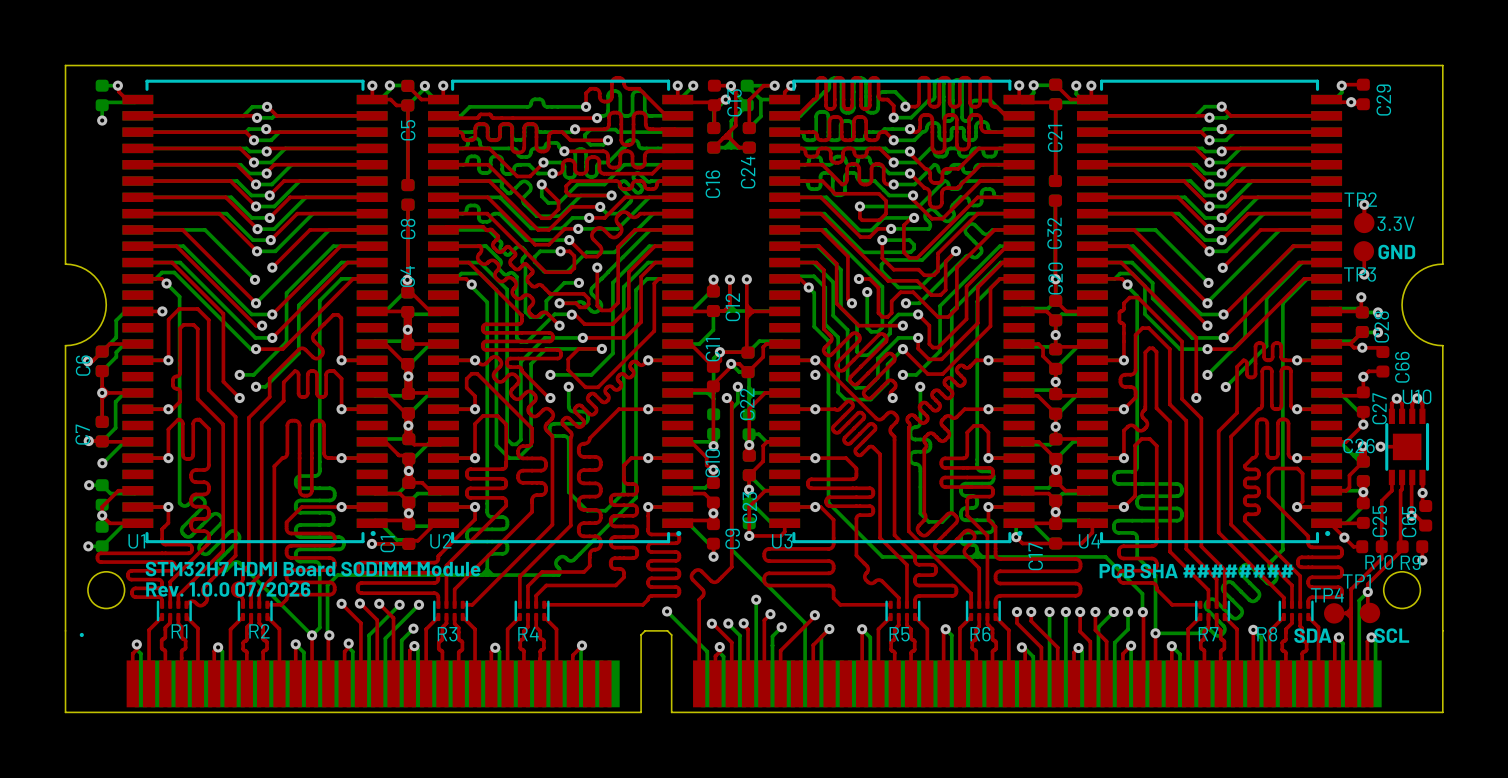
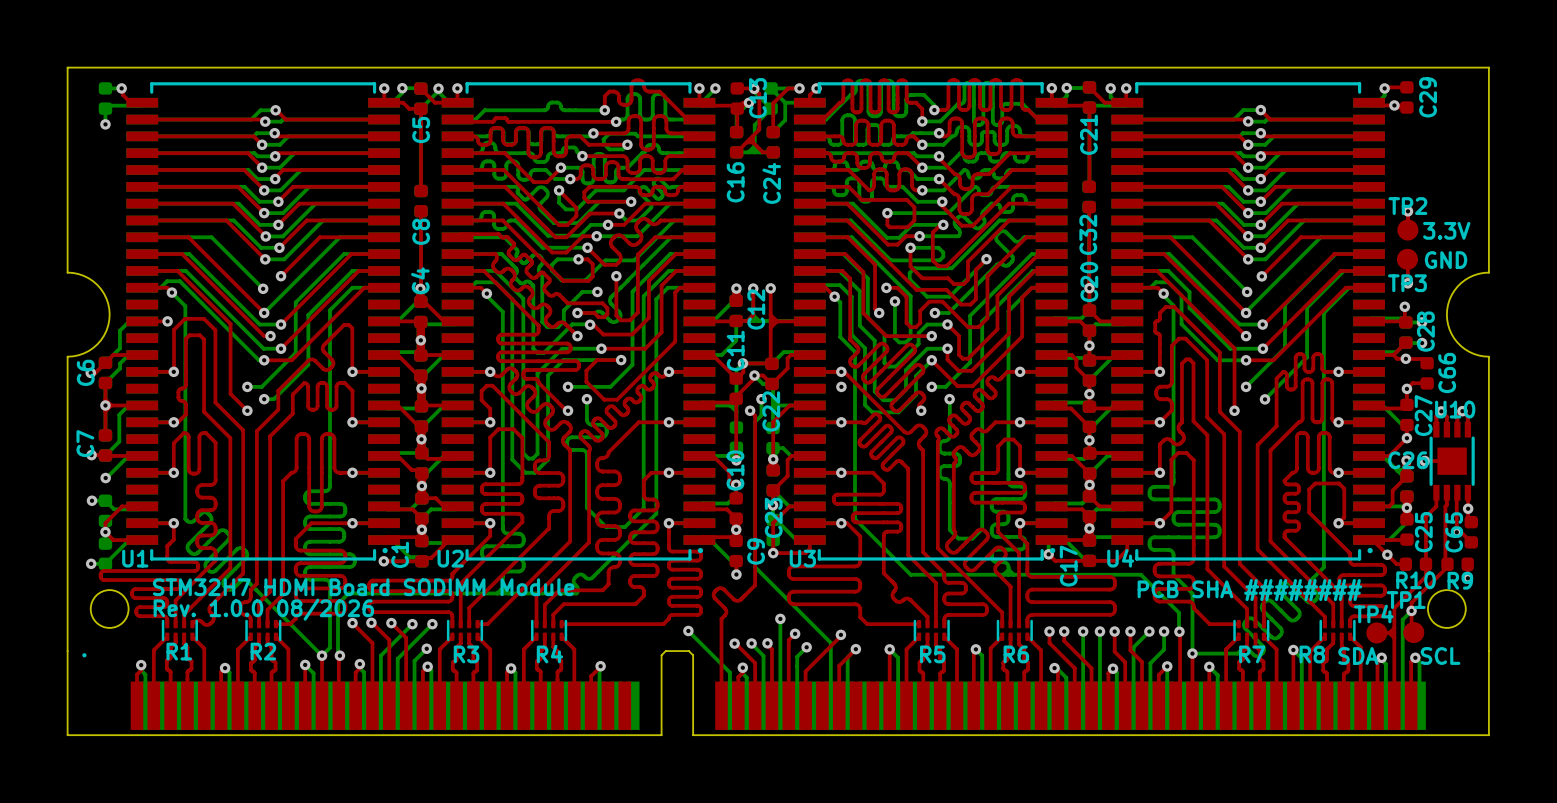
text: Rev. 1.0.0 07/2026 (228, 589) -> Rev. 1.0.0 08/2026 (263, 609)

